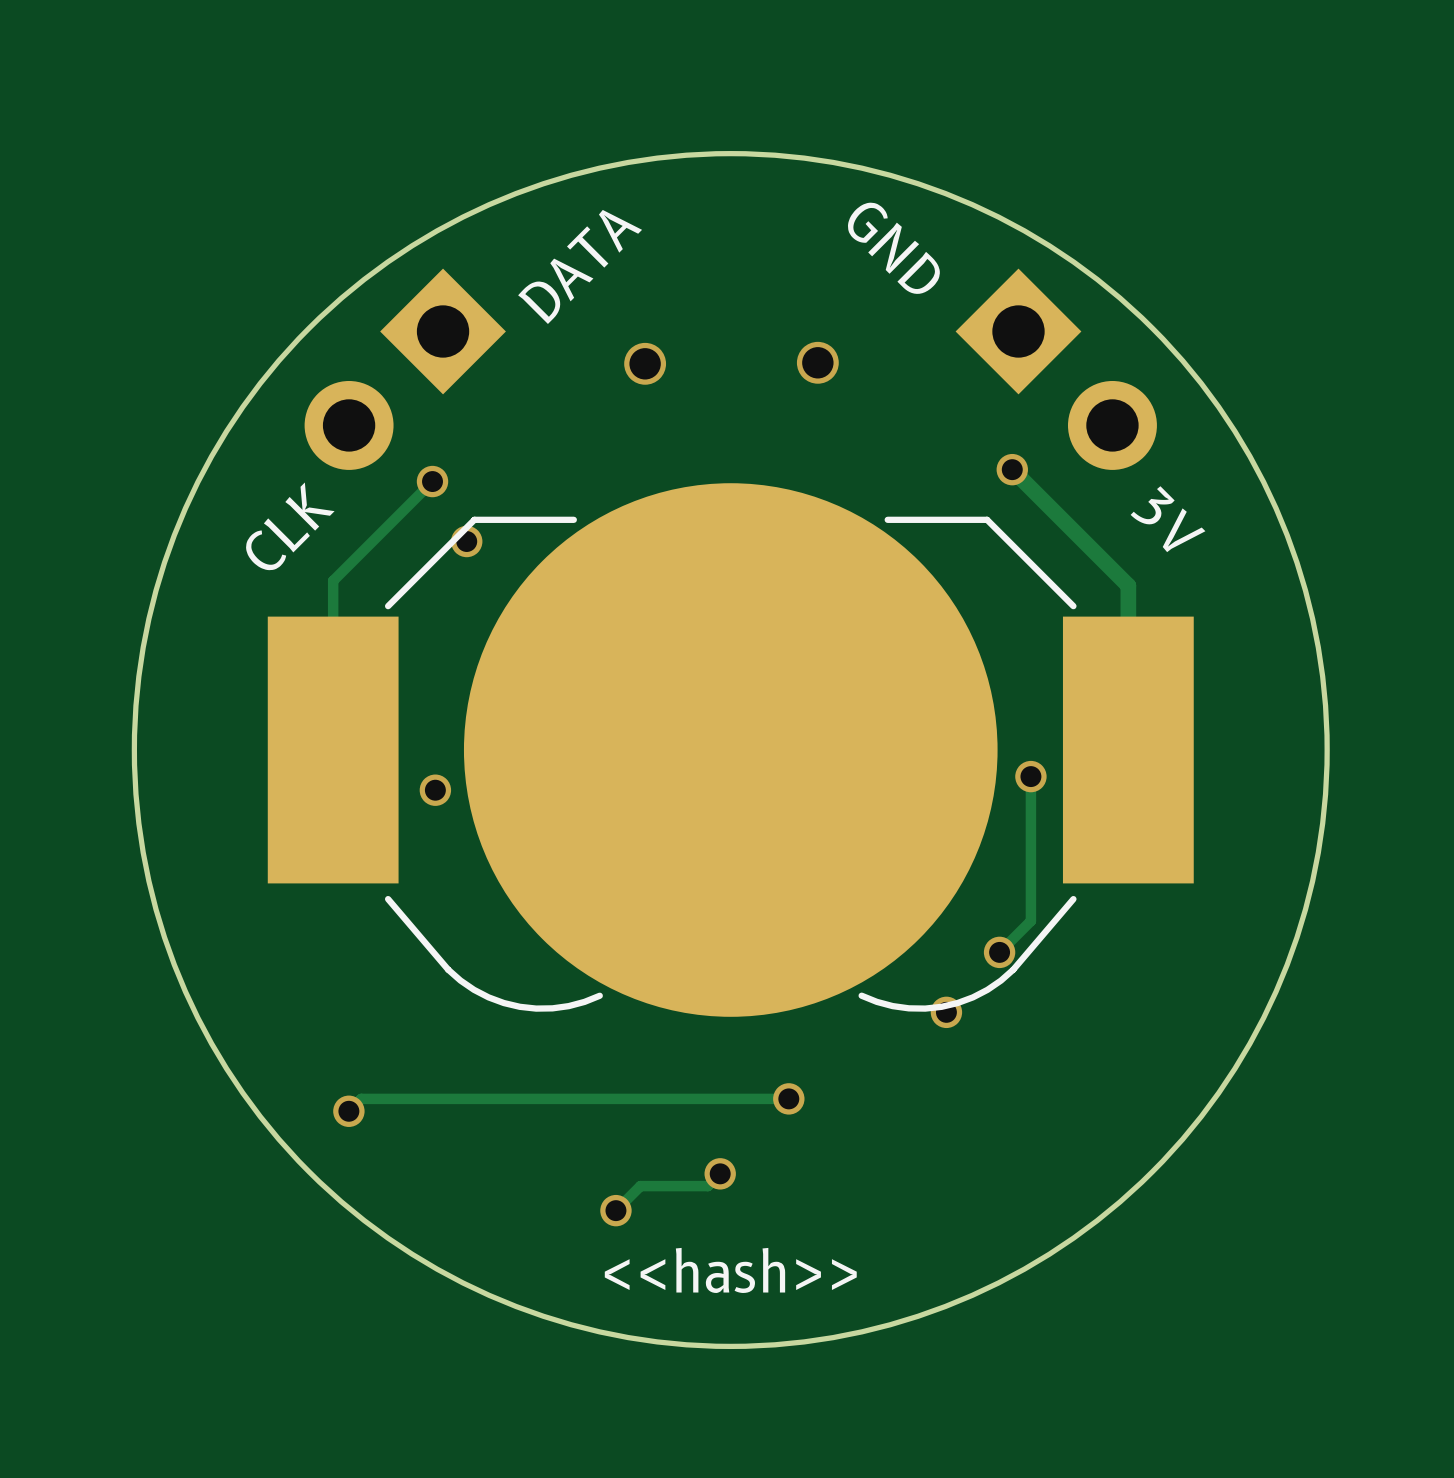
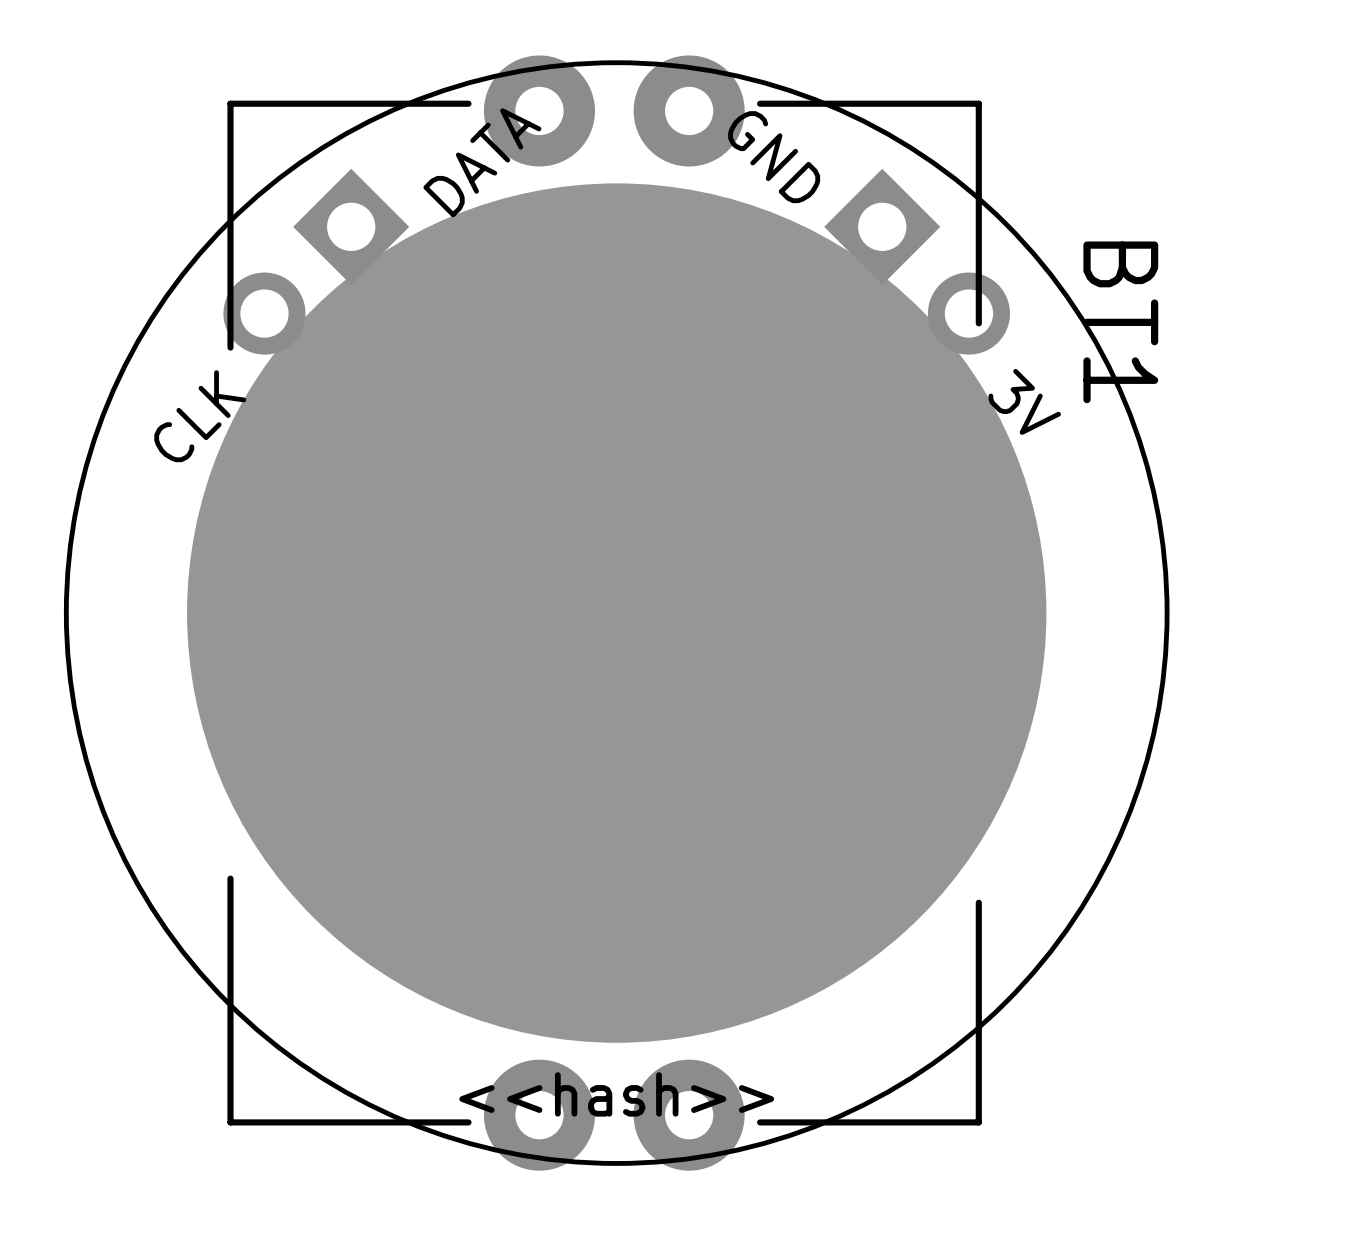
via: (817, 362) -> none
via: (645, 363) -> none
track: (1012, 469) (1128, 585) (1128, 750) -> none
via: (1012, 469) -> none
track: (432, 481) (333, 580) (333, 750) -> none
via: (432, 481) -> none
via: (466, 541) -> none
part: (730, 750) -> none
BT1: none -> (616, 613)
track: (1030, 776) (1030, 921) (999, 952) -> none
via: (1030, 776) -> none
via: (435, 790) -> none
via: (999, 952) -> none
via: (946, 1012) -> none
track: (788, 1098) (361, 1098) (348, 1111) -> none
via: (788, 1098) -> none
via: (348, 1111) -> none
track: (720, 1173) (707, 1186) (640, 1186) (615, 1210) -> none
via: (720, 1173) -> none
via: (615, 1210) -> none

